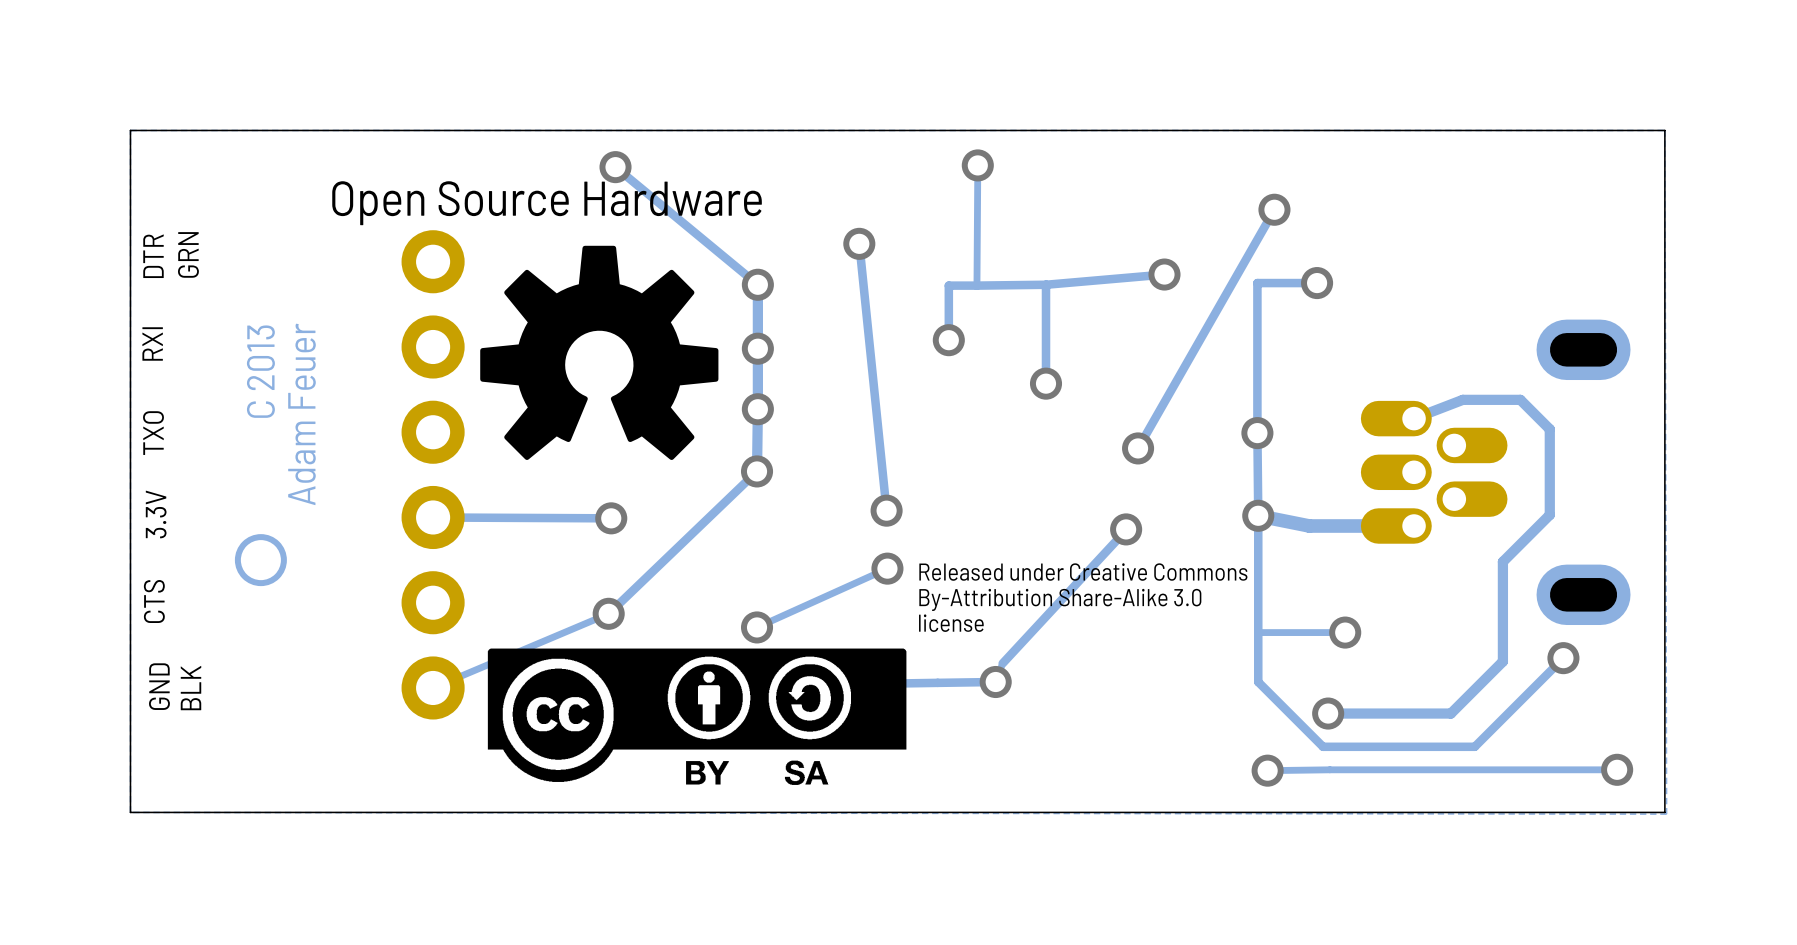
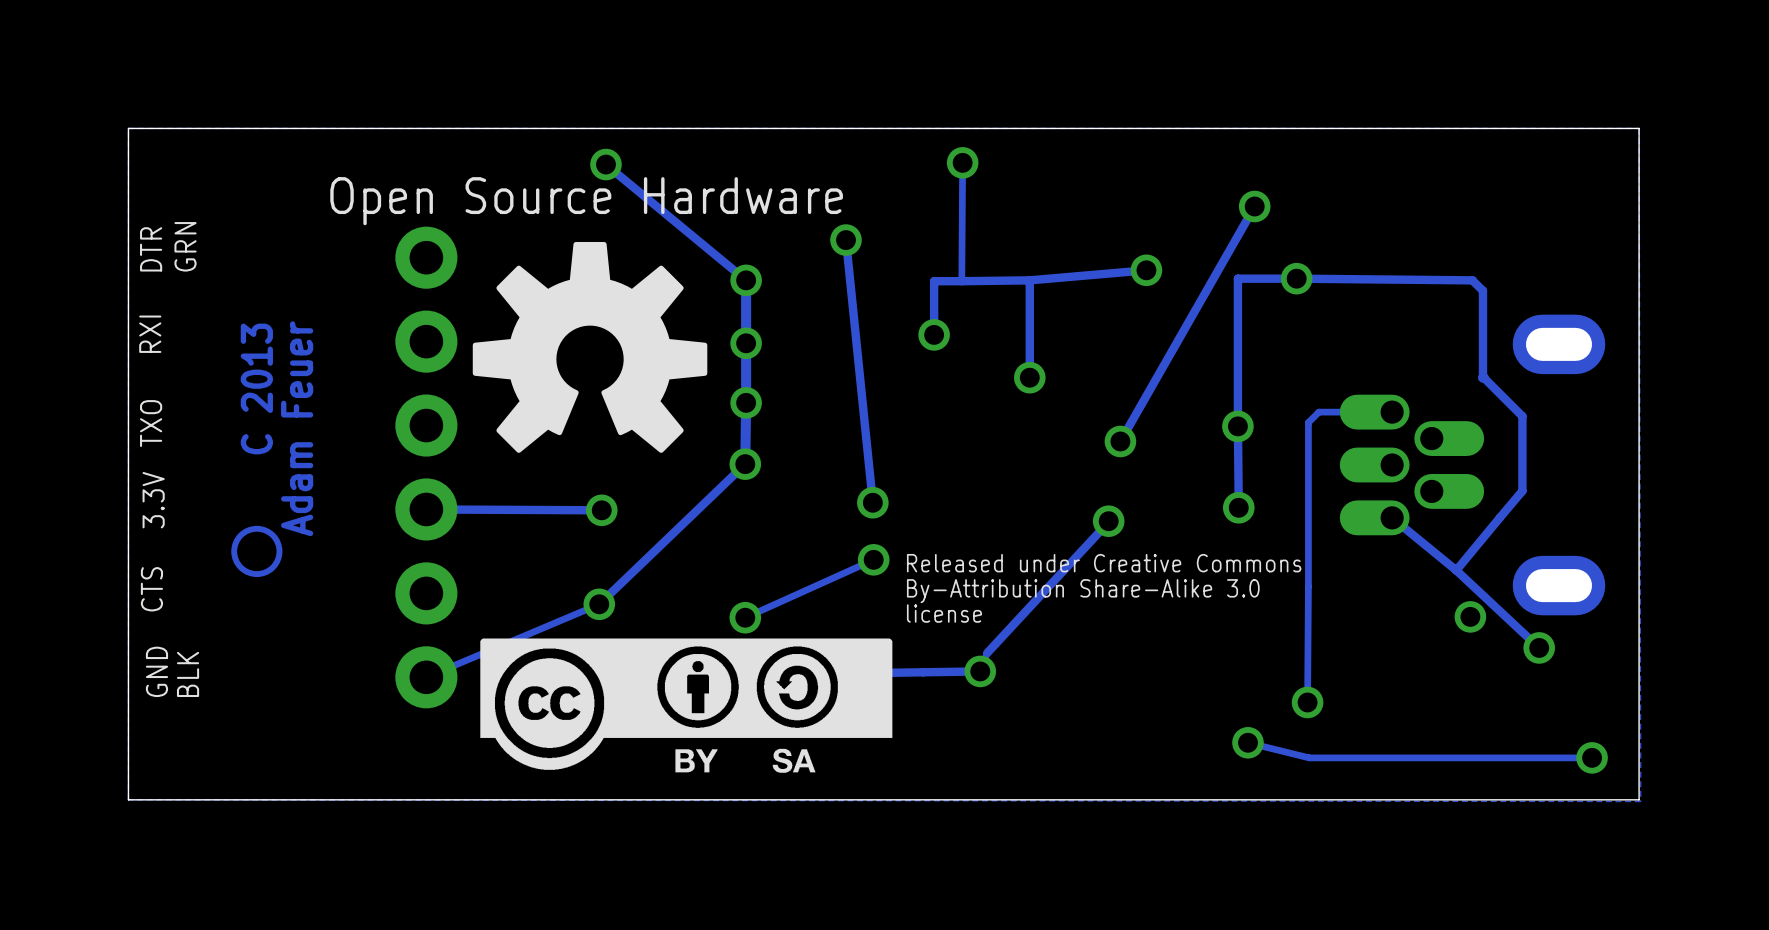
track: none -> (1296, 278) (1472, 280) (1482, 290) (1482, 377) (1522, 416) (1522, 491) (1456, 570)
track: (1414, 418) (1462, 399) (1520, 399) (1549, 429) (1549, 514) (1502, 561) (1502, 661) (1450, 713) (1328, 713) -> (1392, 412) (1318, 412) (1308, 422) (1307, 702)
track: (1414, 526) (1309, 526) (1258, 515) (1258, 682) (1323, 746) (1474, 746) (1563, 658) -> (1456, 570) (1539, 647)
track: none -> (1392, 517) (1456, 570)
via: none -> (1470, 616)
track: (1345, 632) (1258, 632) -> none
via: (1345, 632) -> none
track: (1329, 769) (1267, 770) -> (1309, 757) (1247, 742)
via position: (1267, 770) -> (1247, 742)

